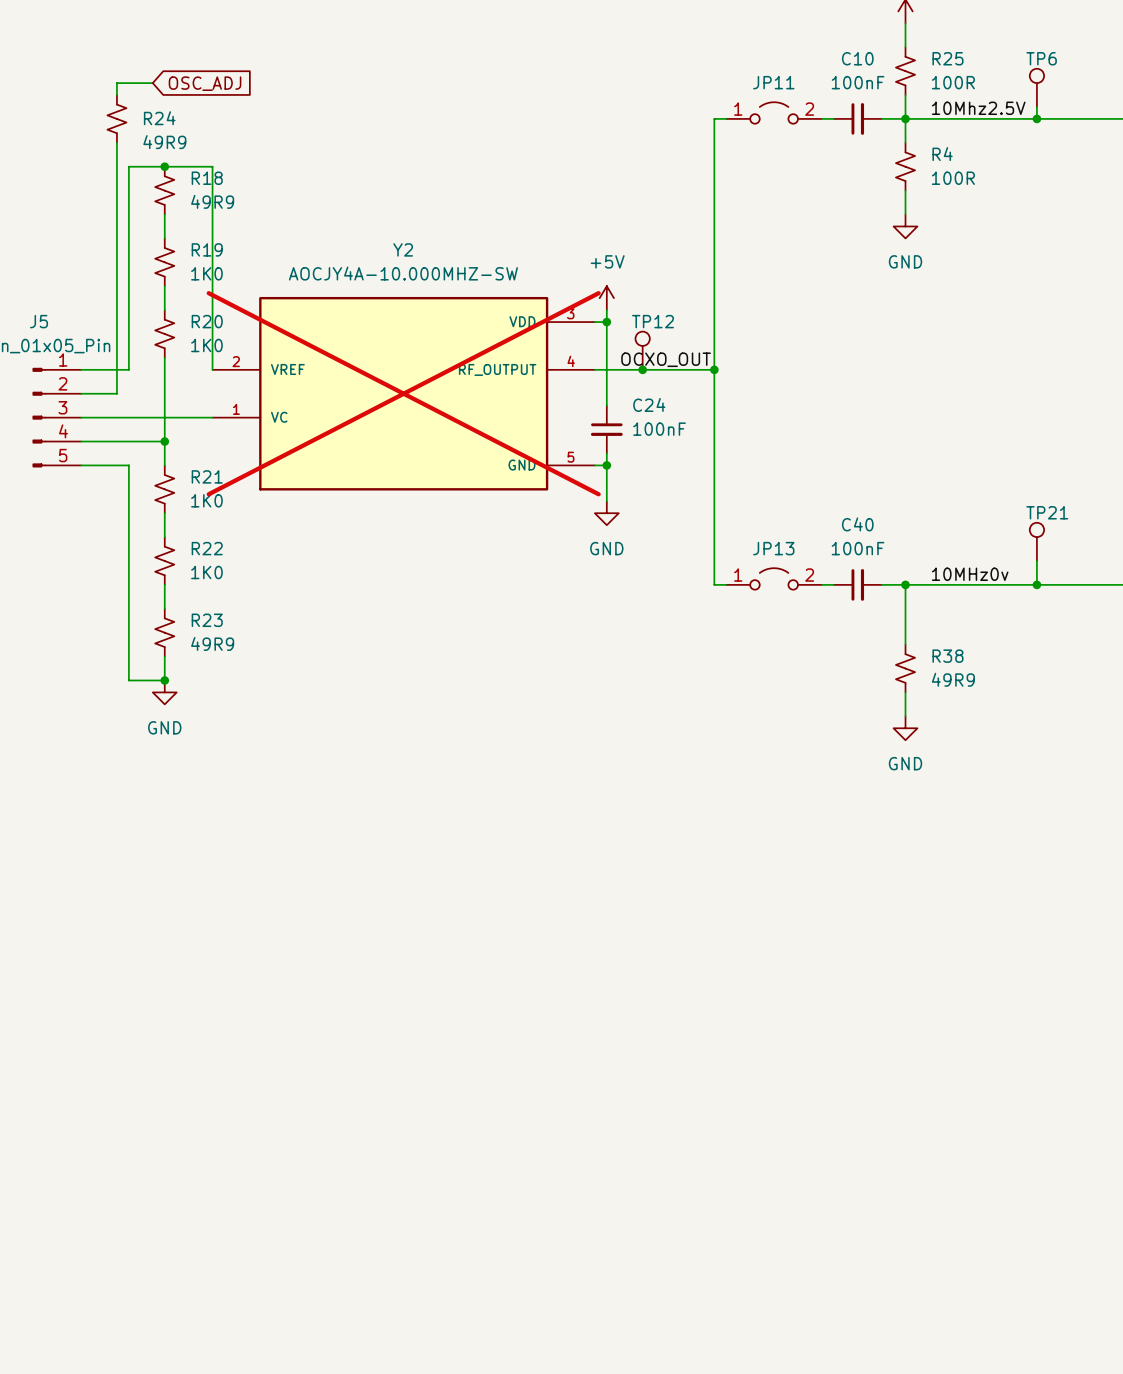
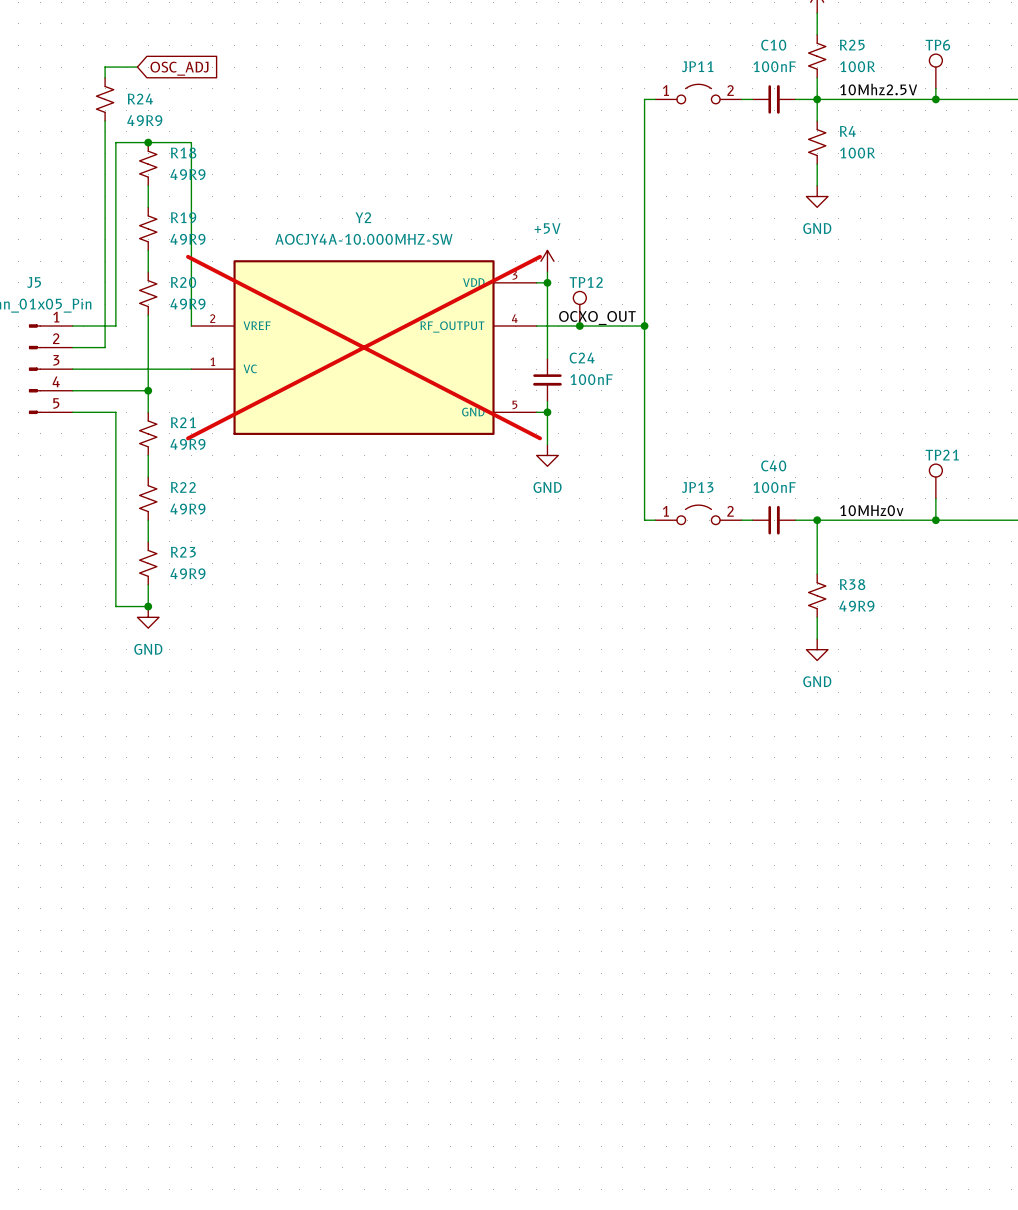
R19 value: 1K0 (206, 273) -> 49R9 (188, 239)
R20 value: 1K0 (206, 345) -> 49R9 (188, 304)
R21 value: 1K0 (206, 500) -> 49R9 (188, 444)
R22 value: 1K0 (206, 572) -> 49R9 (188, 509)

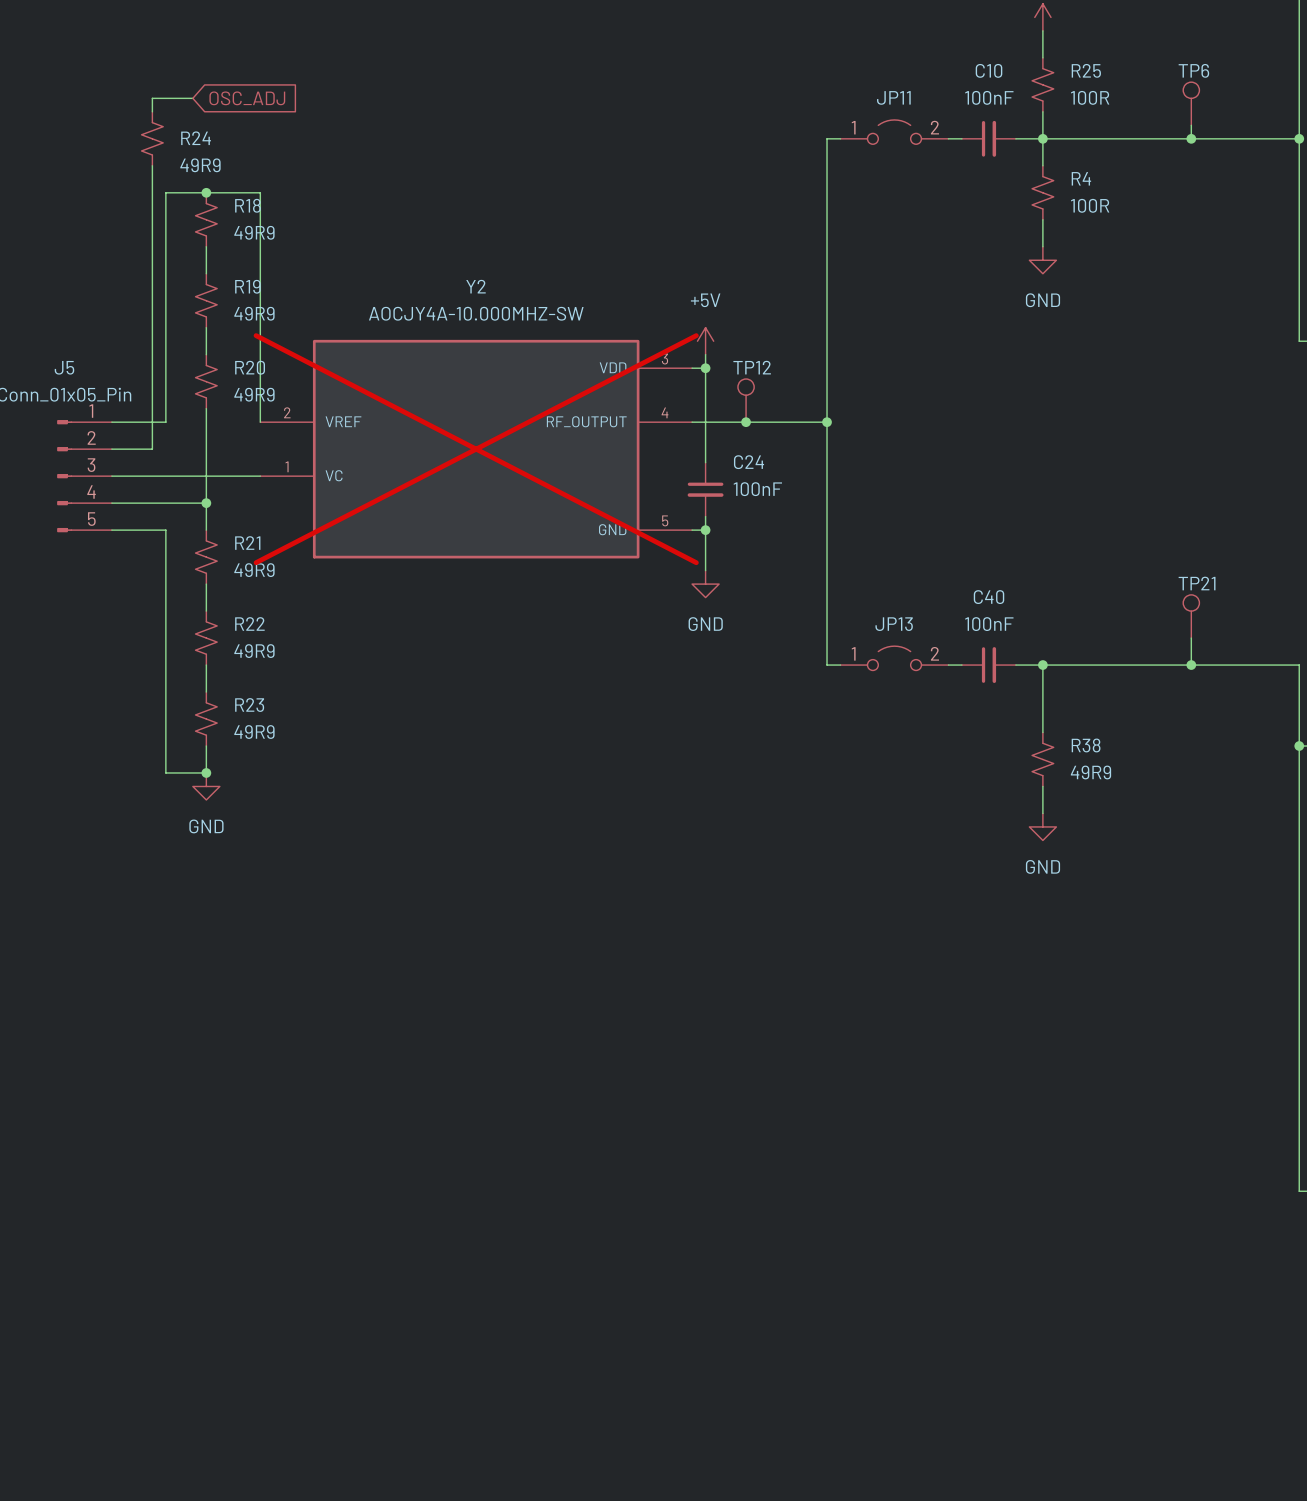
label: 10Mhz2.5V (878, 89) -> none
label: OCXO_OUT (597, 317) -> none
label: 10MHz0v (871, 510) -> none

